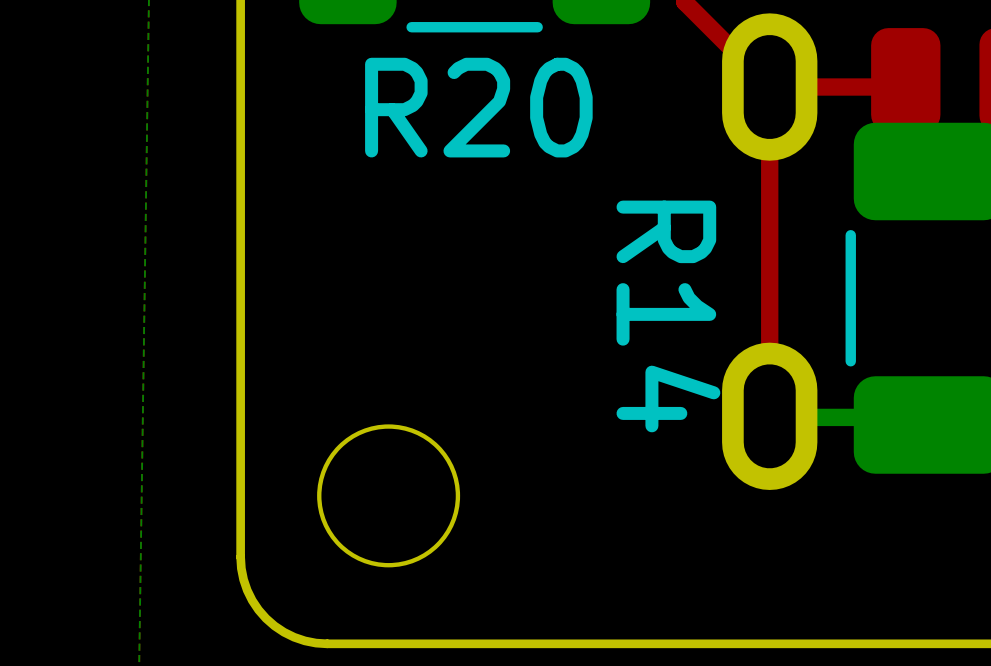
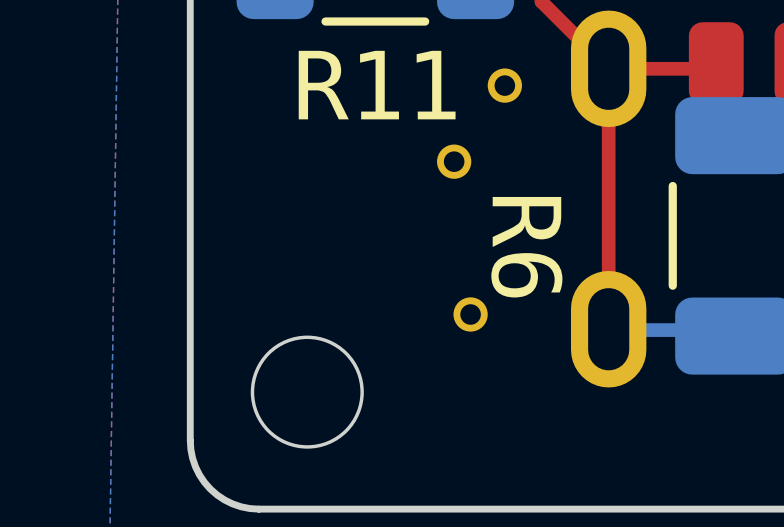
R20 name: R20 (478, 107) -> R11 (377, 85)
part: none -> (504, 85)
part: none -> (454, 161)
R14 name: R14 (668, 316) -> R6 (526, 247)
part: none -> (470, 314)

